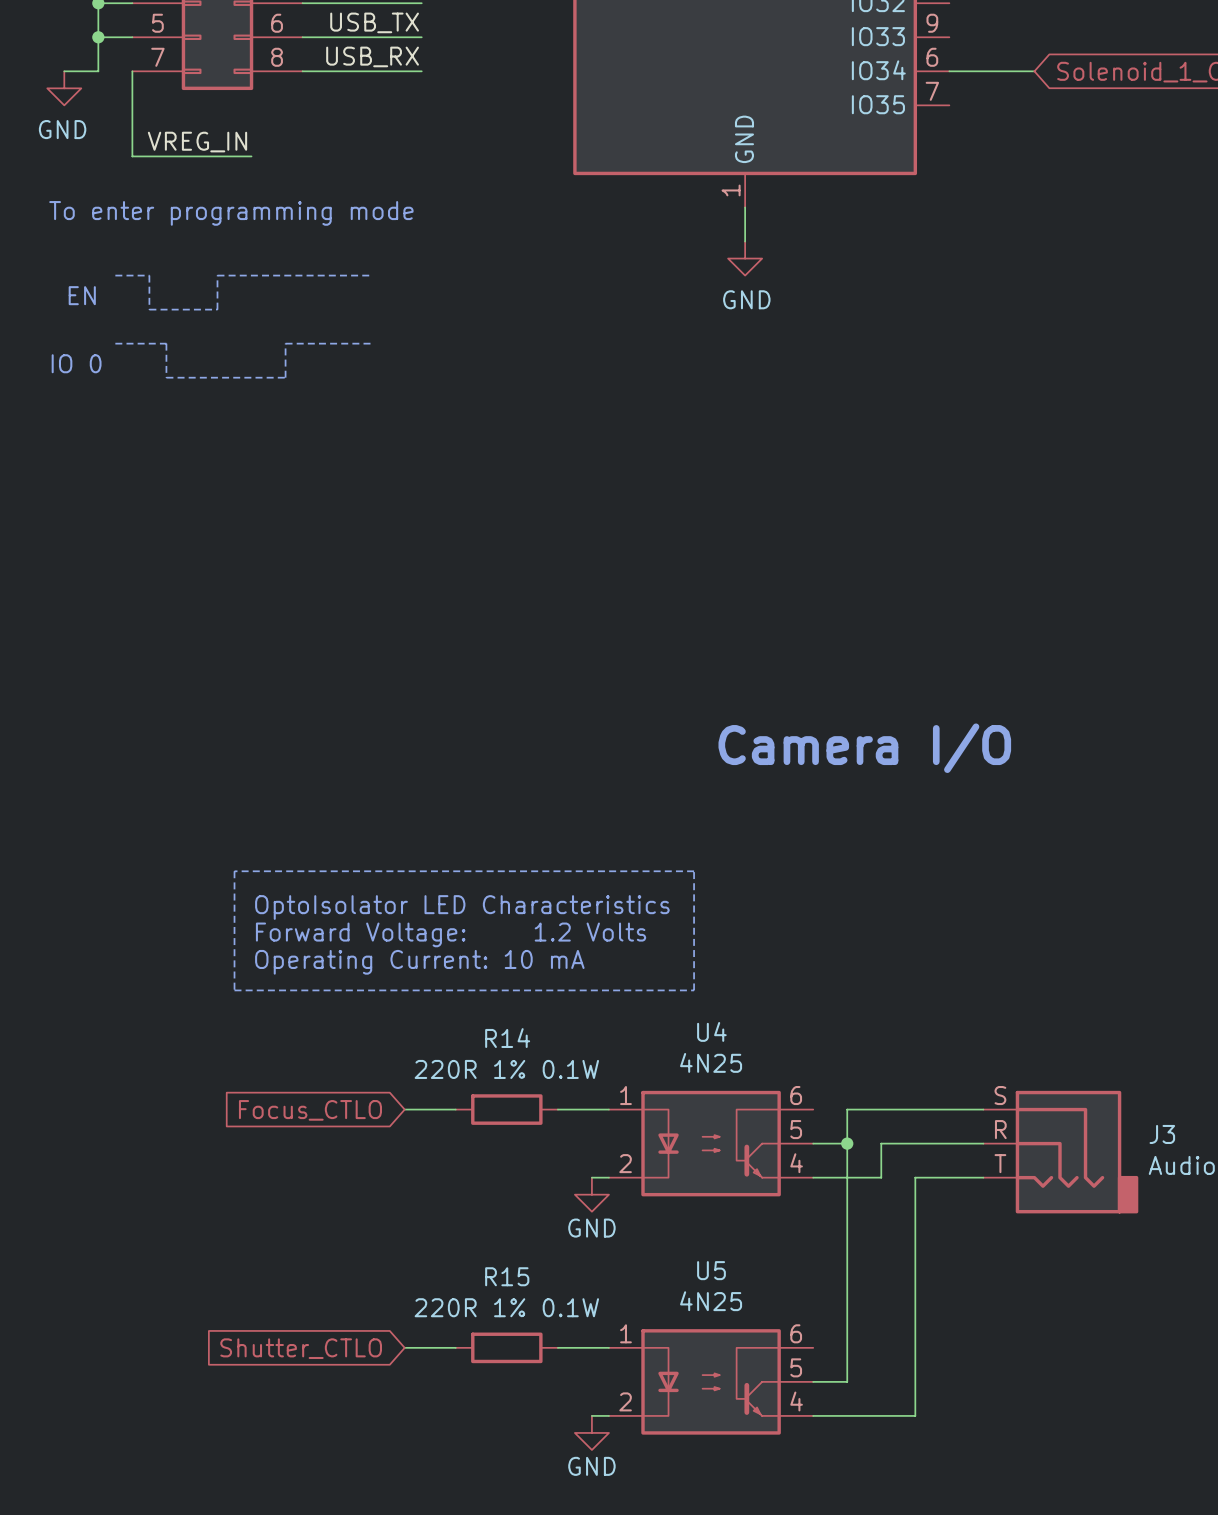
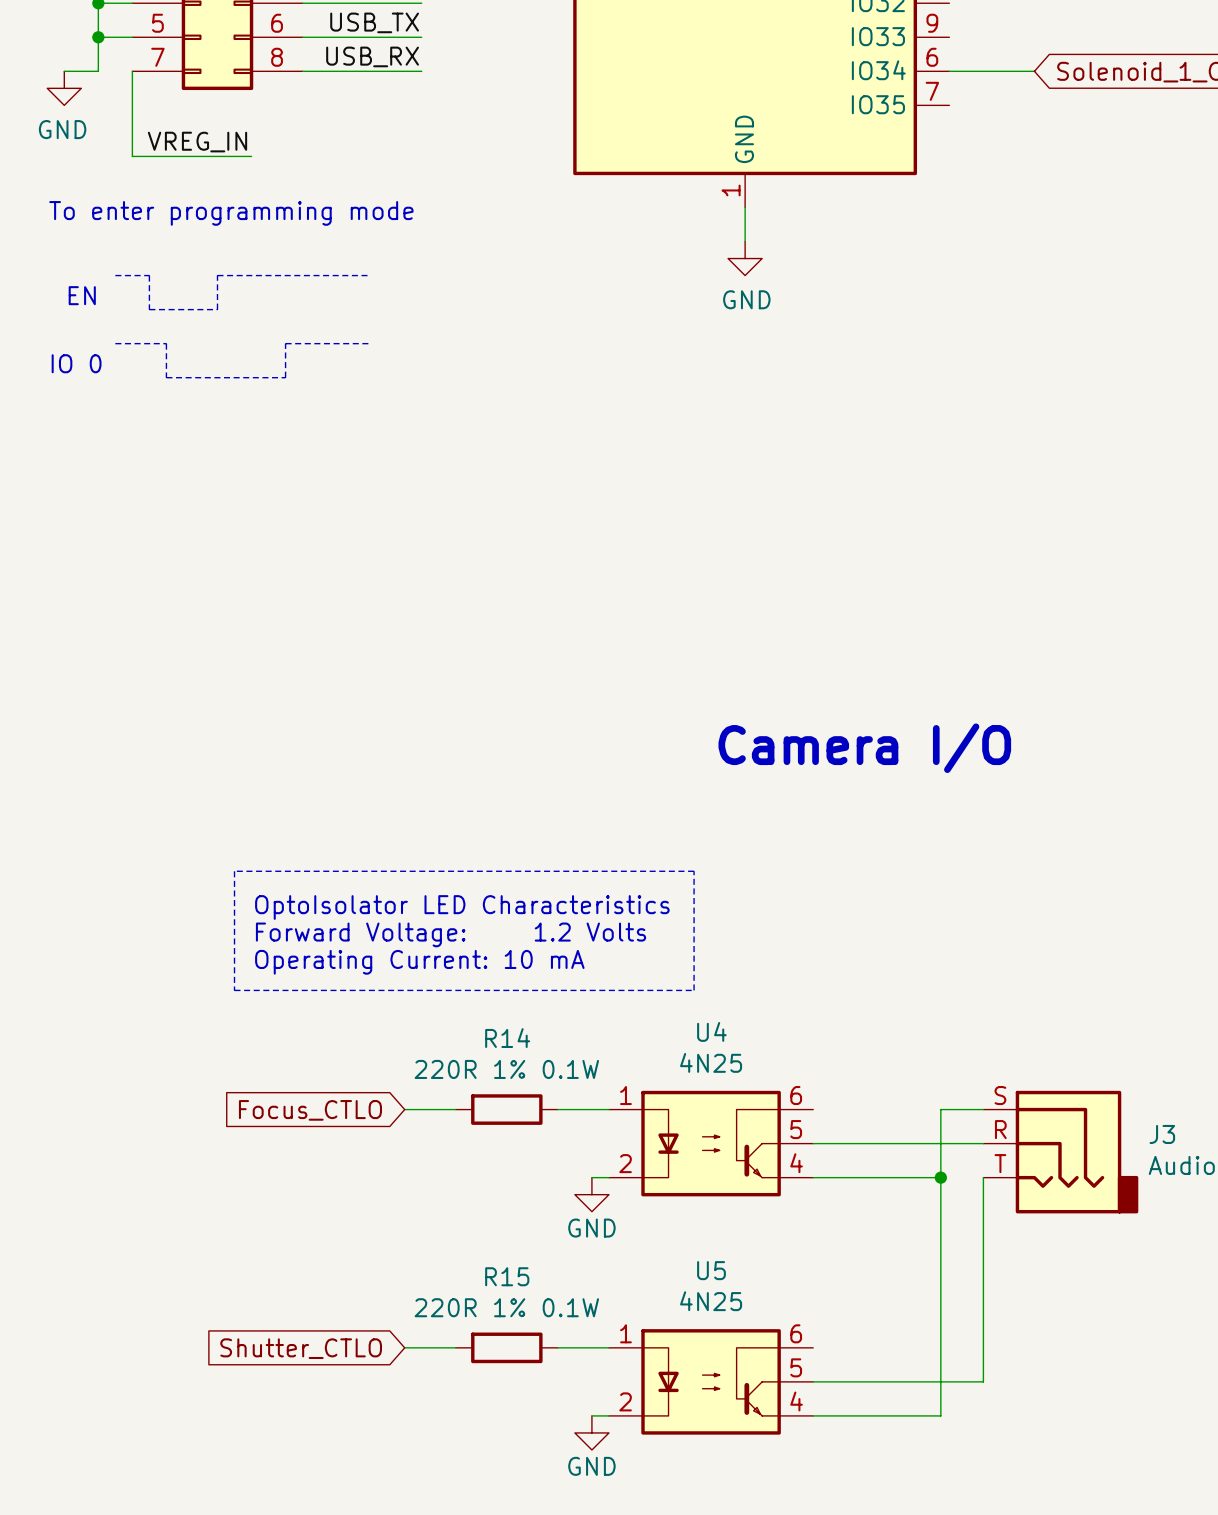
wire: (940, 1109) (847, 1109) (847, 1381) -> (983, 1177) (983, 1381) (847, 1381)
wire: none -> (847, 1143) (881, 1143)
junction: (847, 1143) -> none
wire: (881, 1143) (881, 1177) -> (915, 1177) (881, 1177)
wire: (915, 1177) (915, 1415) -> (940, 1109) (940, 1415) (915, 1415)
wire: (940, 1177) (983, 1177) -> none
junction: none -> (940, 1177)

